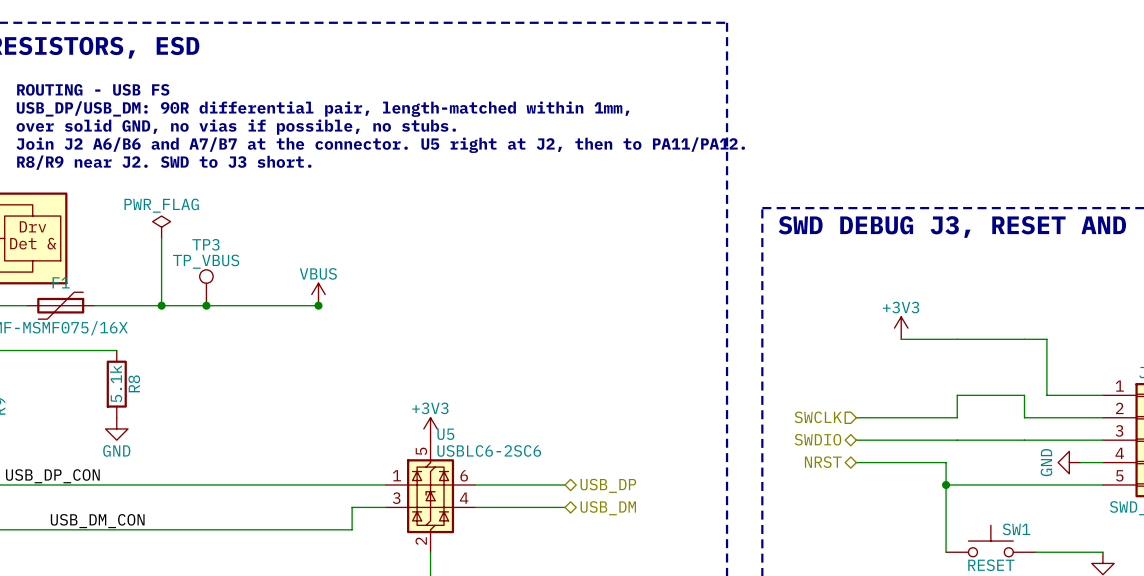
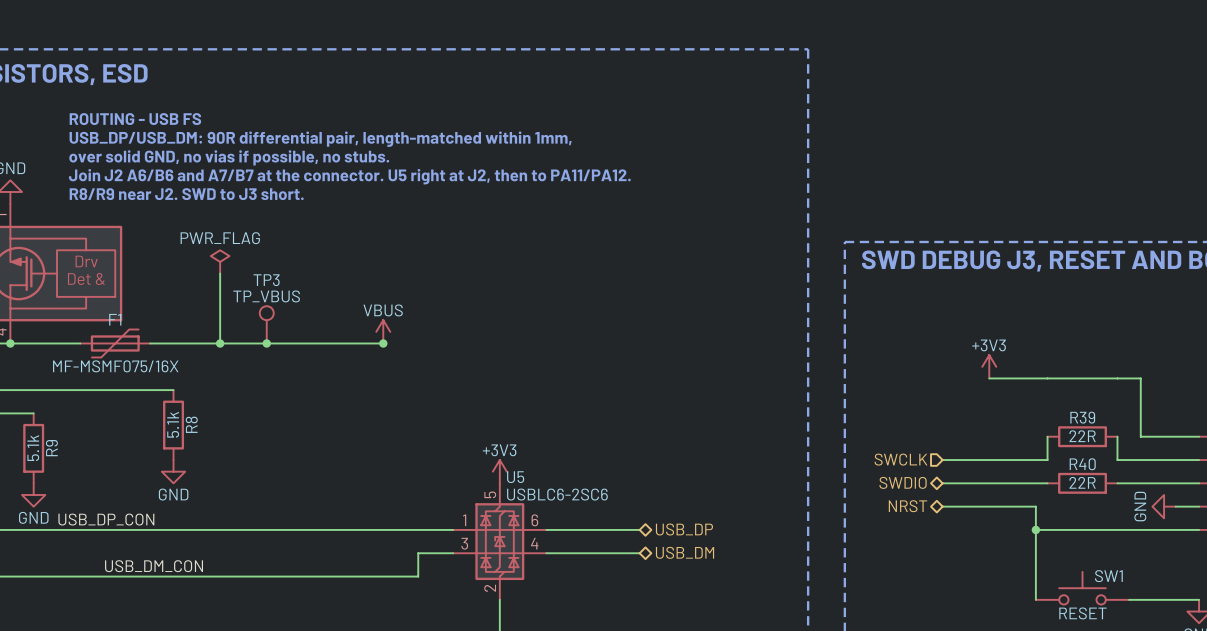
wire: (957, 395) (1024, 395) -> none
R39: none -> 22R (1082, 436)
wire: (957, 440) (1024, 440) -> none
R40: none -> 22R (1082, 483)

